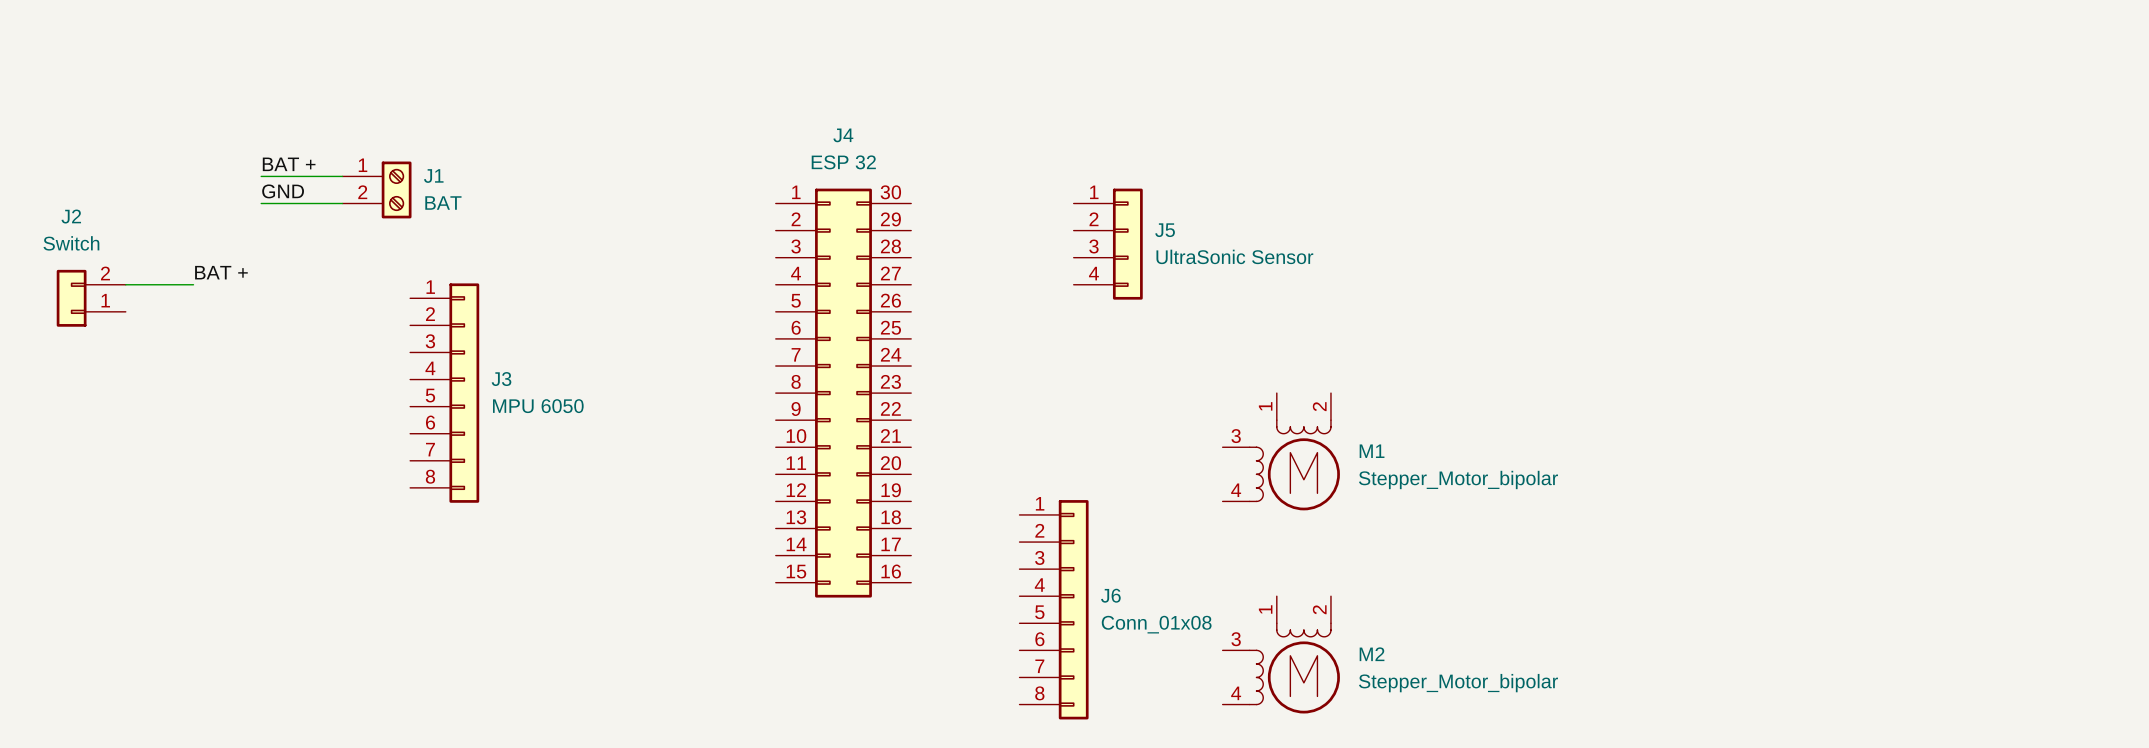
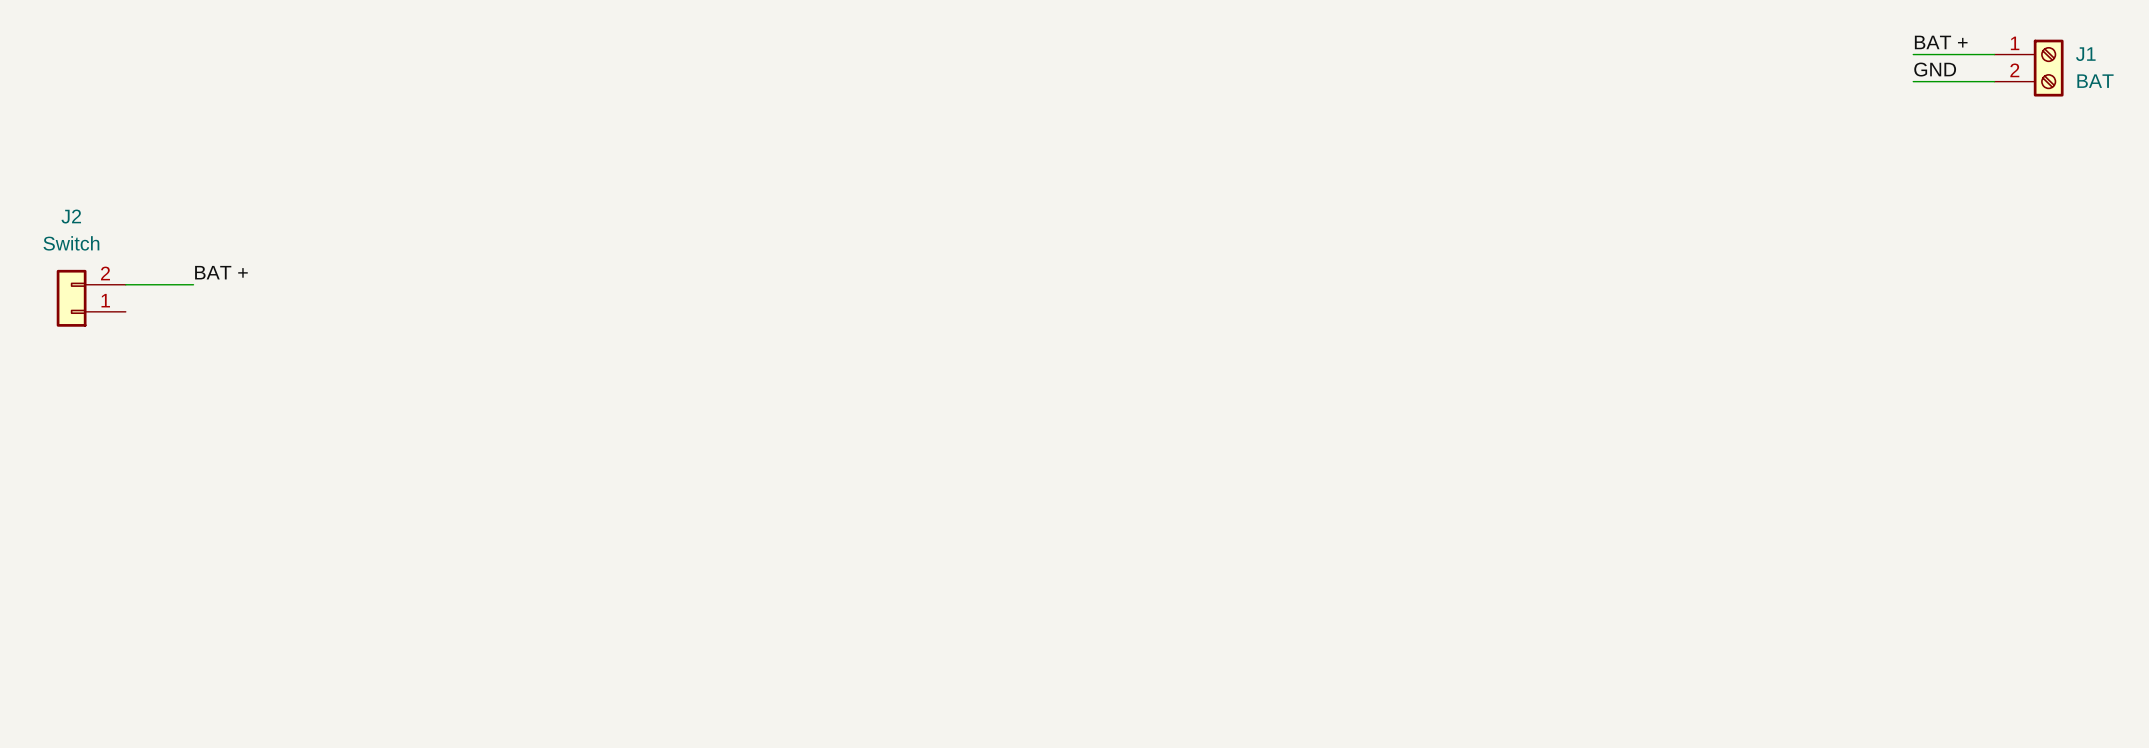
label: none -> BAT + (1941, 42)
wire: none -> (1913, 54) (1994, 54)
label: none -> GND (1935, 69)
wire: none -> (1913, 81) (1994, 81)
label: BAT + (289, 164) -> none
wire: (261, 176) (342, 176) -> none
J1 position: (376, 189) -> (2029, 68)
label: GND (283, 191) -> none
wire: (261, 203) (342, 203) -> none
J5: UltraSonic Sensor (1108, 244) -> none
J3: MPU 6050 (444, 393) -> none
J4: ESP 32 (843, 393) -> none
M1: Stepper_Motor_bipolar (1281, 451) -> none
J6: Conn_01x08 (1054, 609) -> none
M2: Stepper_Motor_bipolar (1281, 654) -> none

